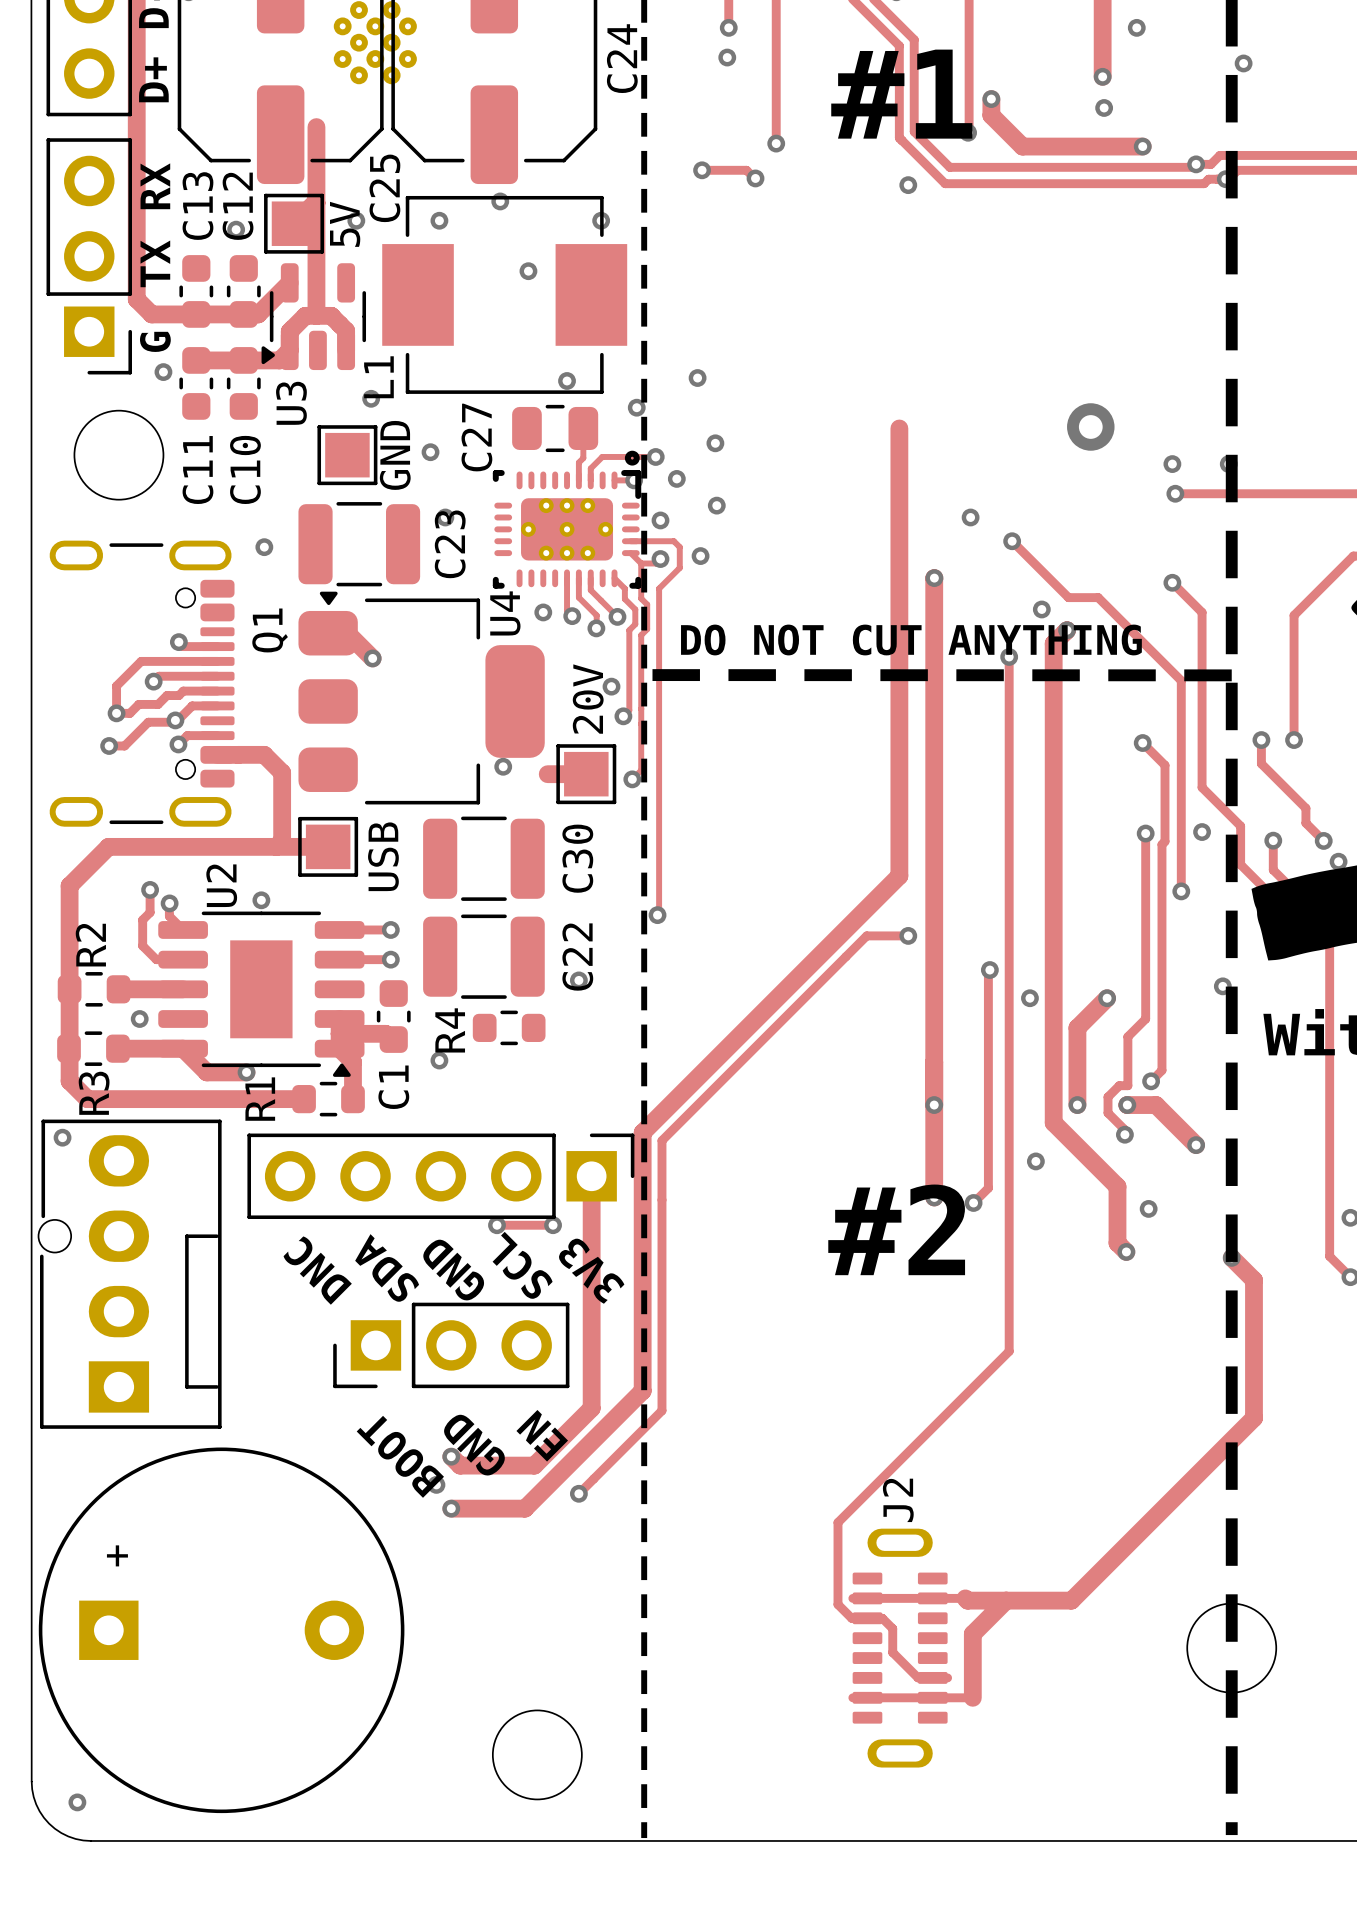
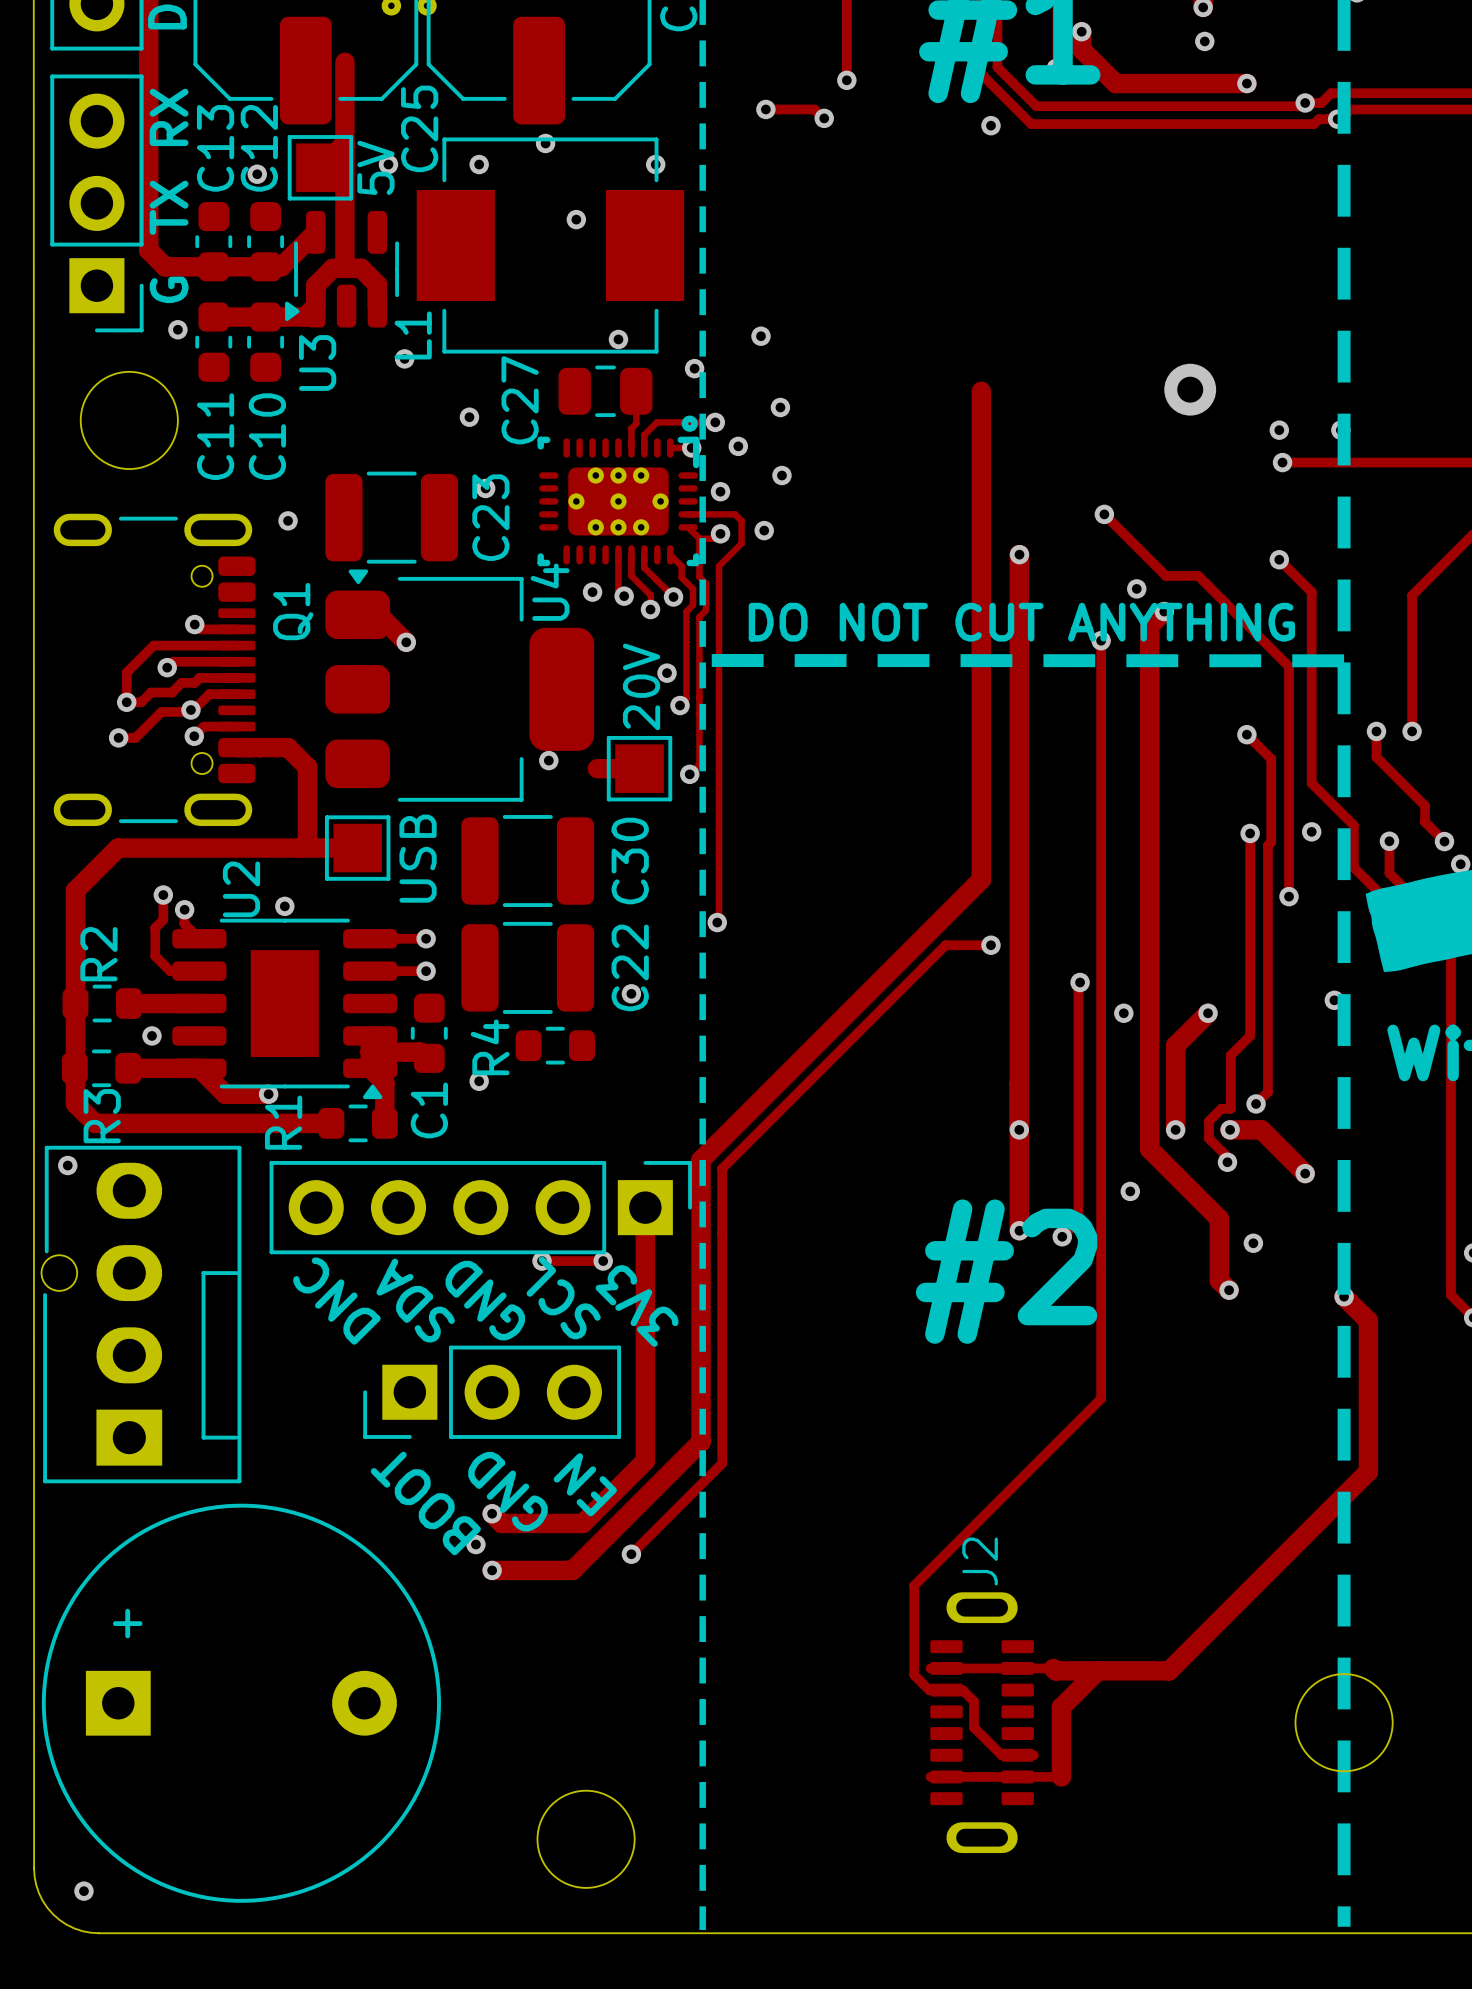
GND: (347, 455) -> none
via: (970, 517) -> none

